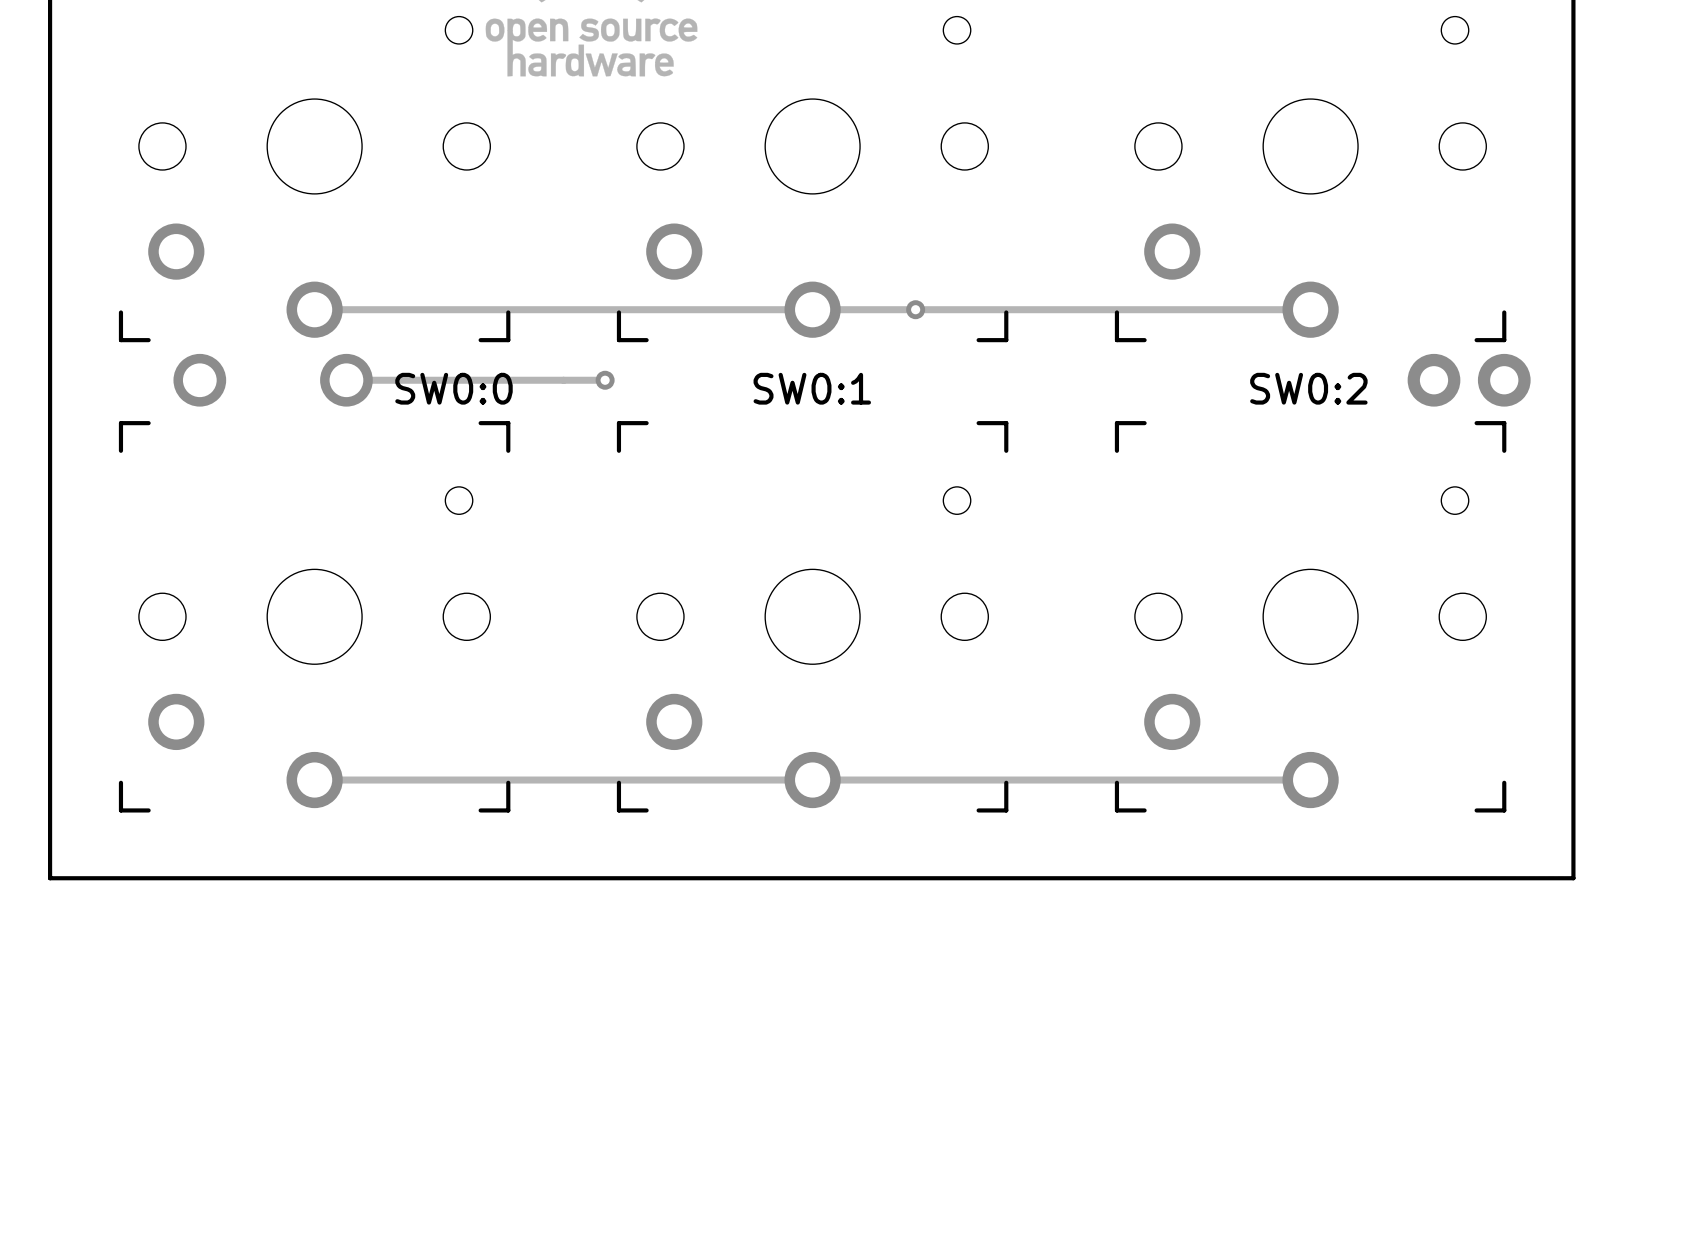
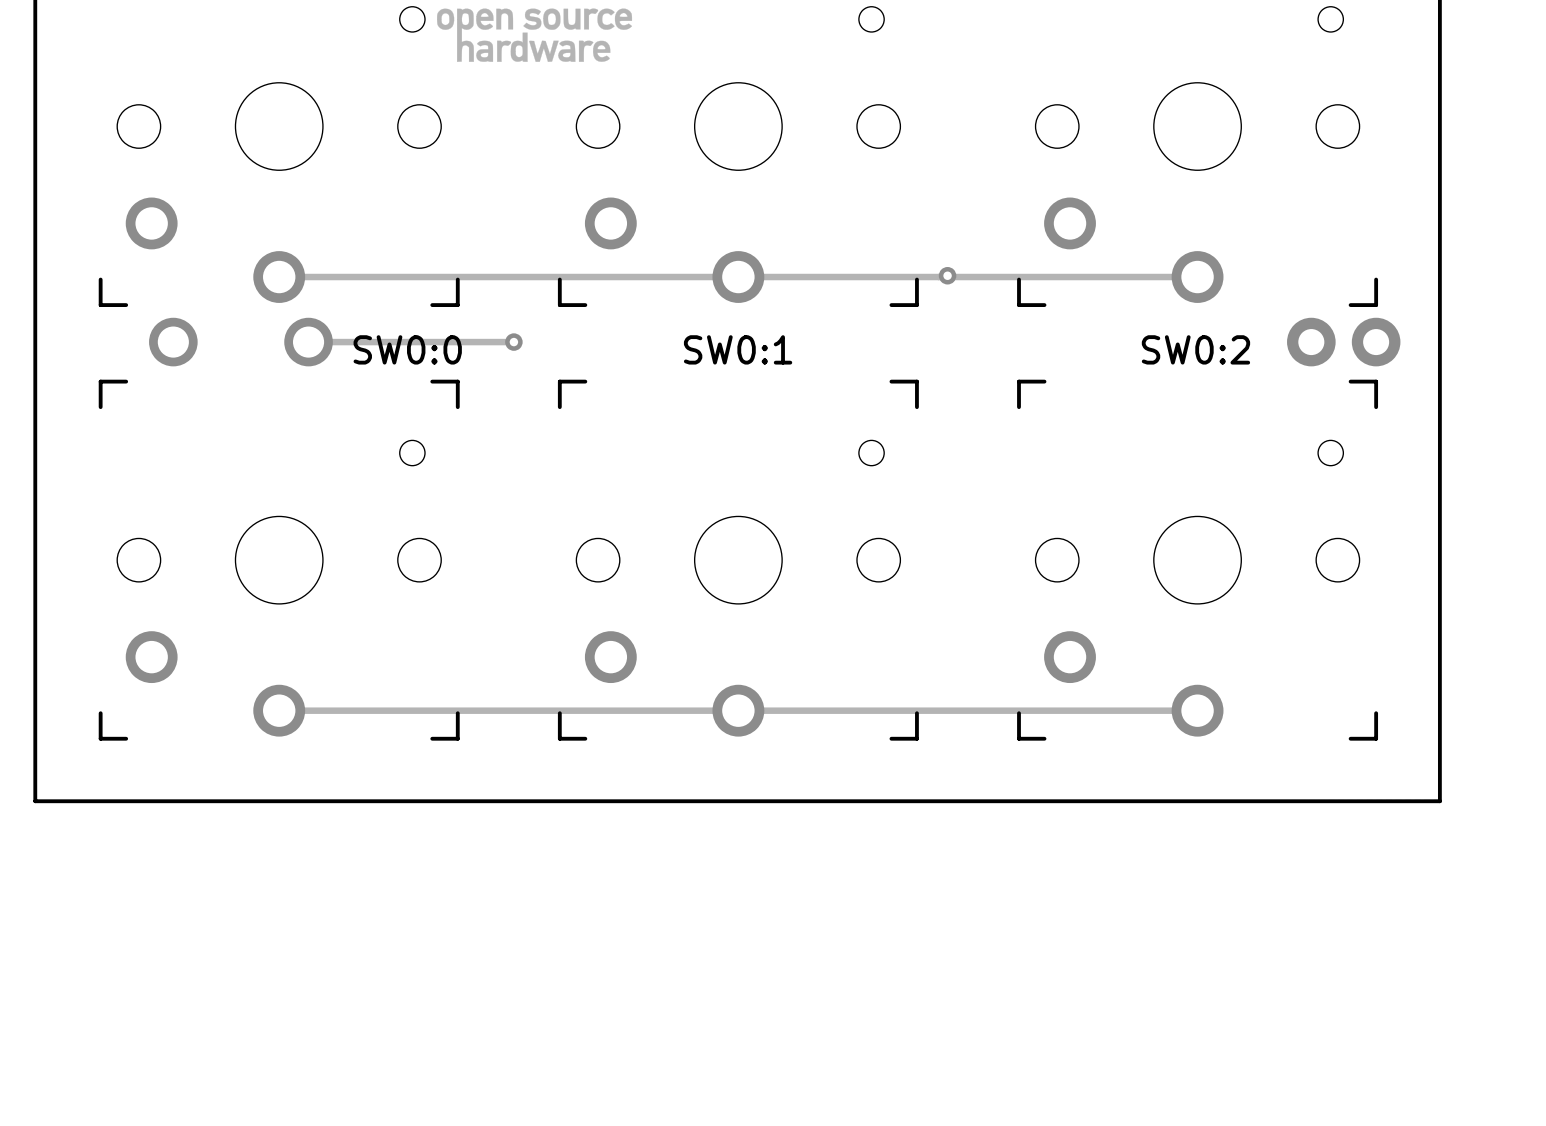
via position: (915, 309) -> (947, 275)
track: (569, 380) (605, 380) -> none
via position: (605, 380) -> (513, 342)

